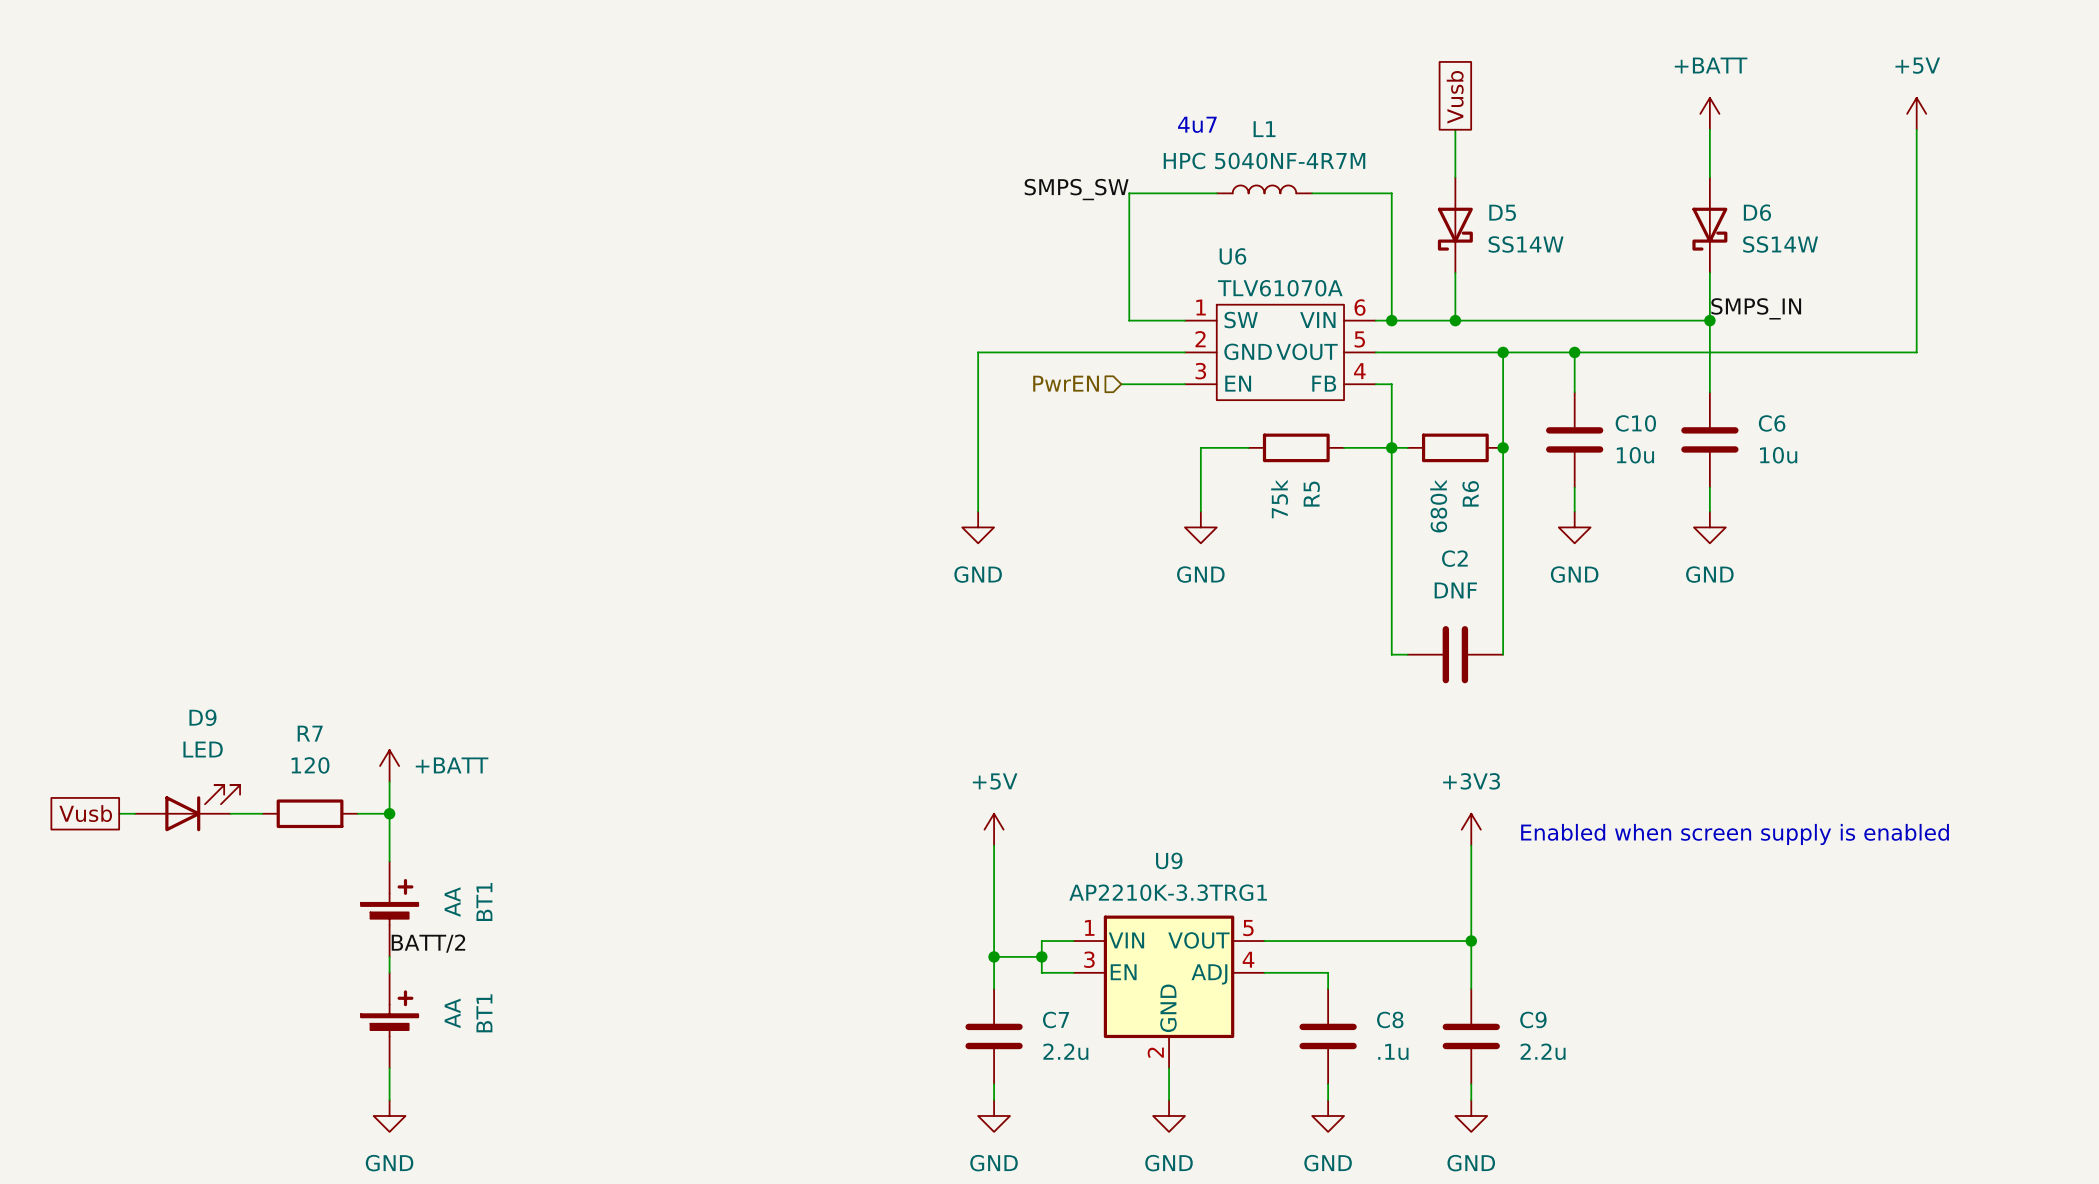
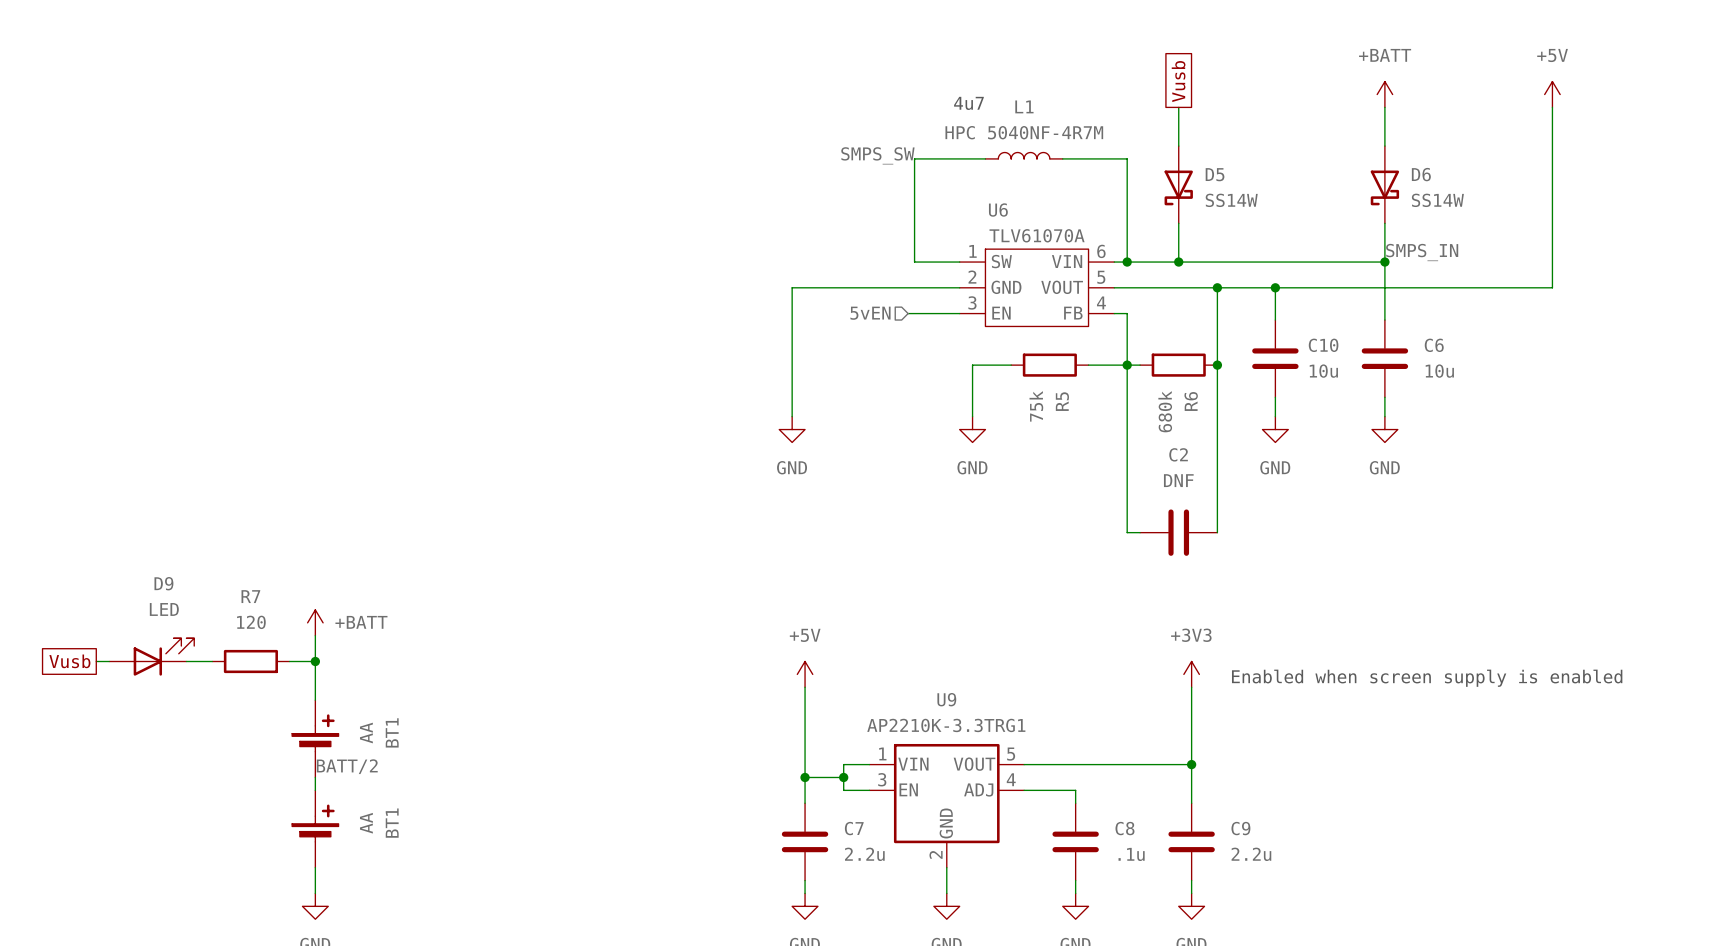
hierarchical label: PwrEN (1066, 383) -> 5vEN (870, 313)

